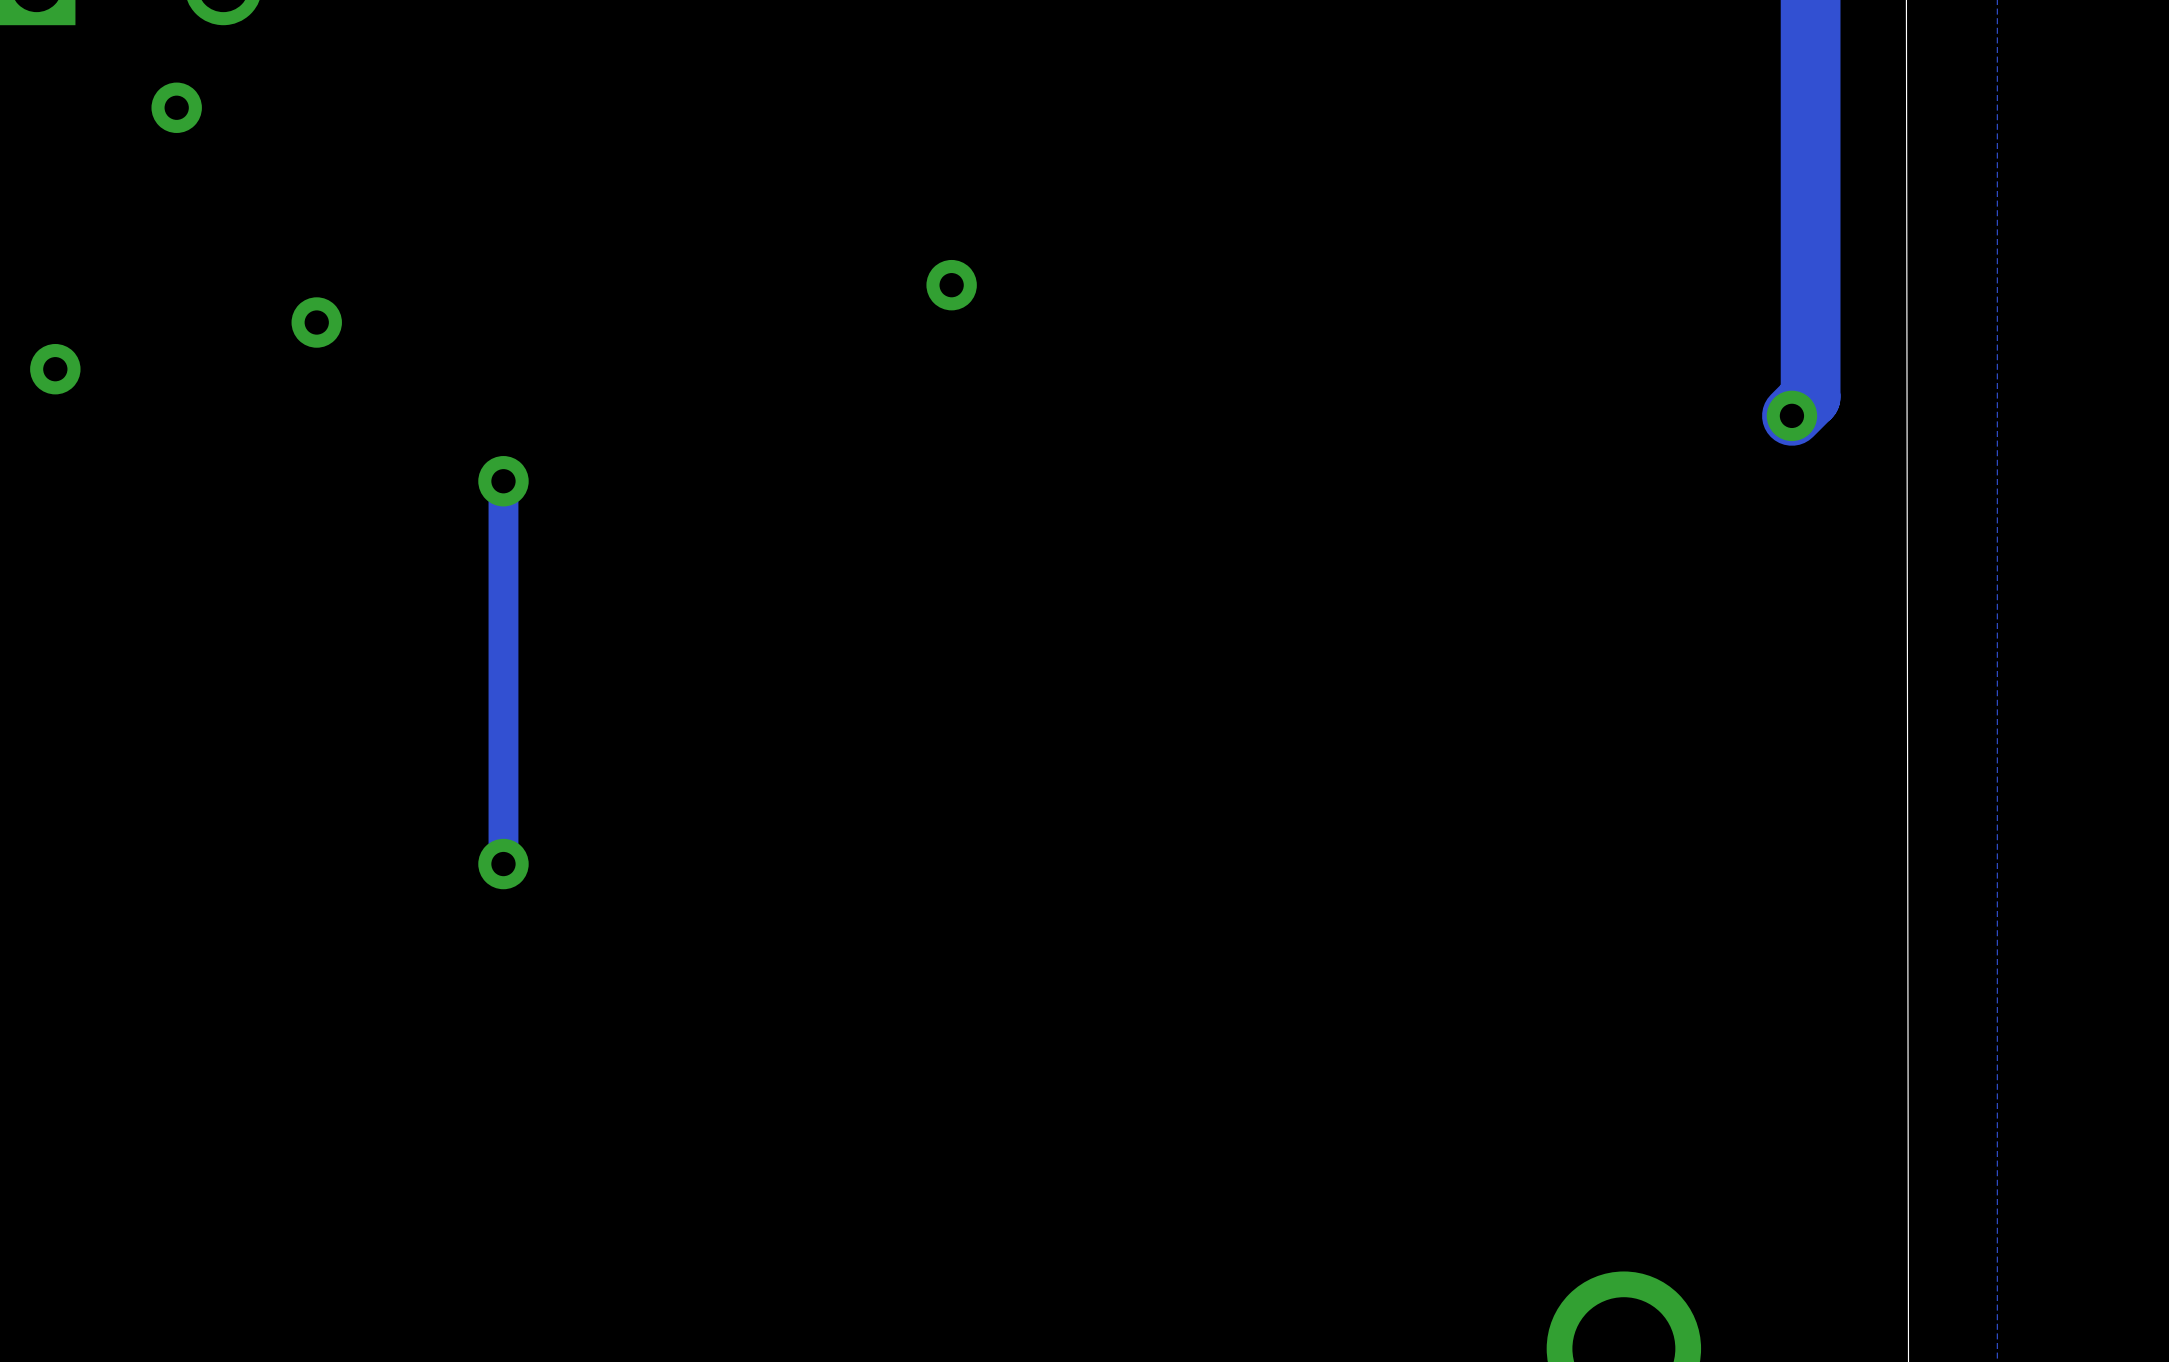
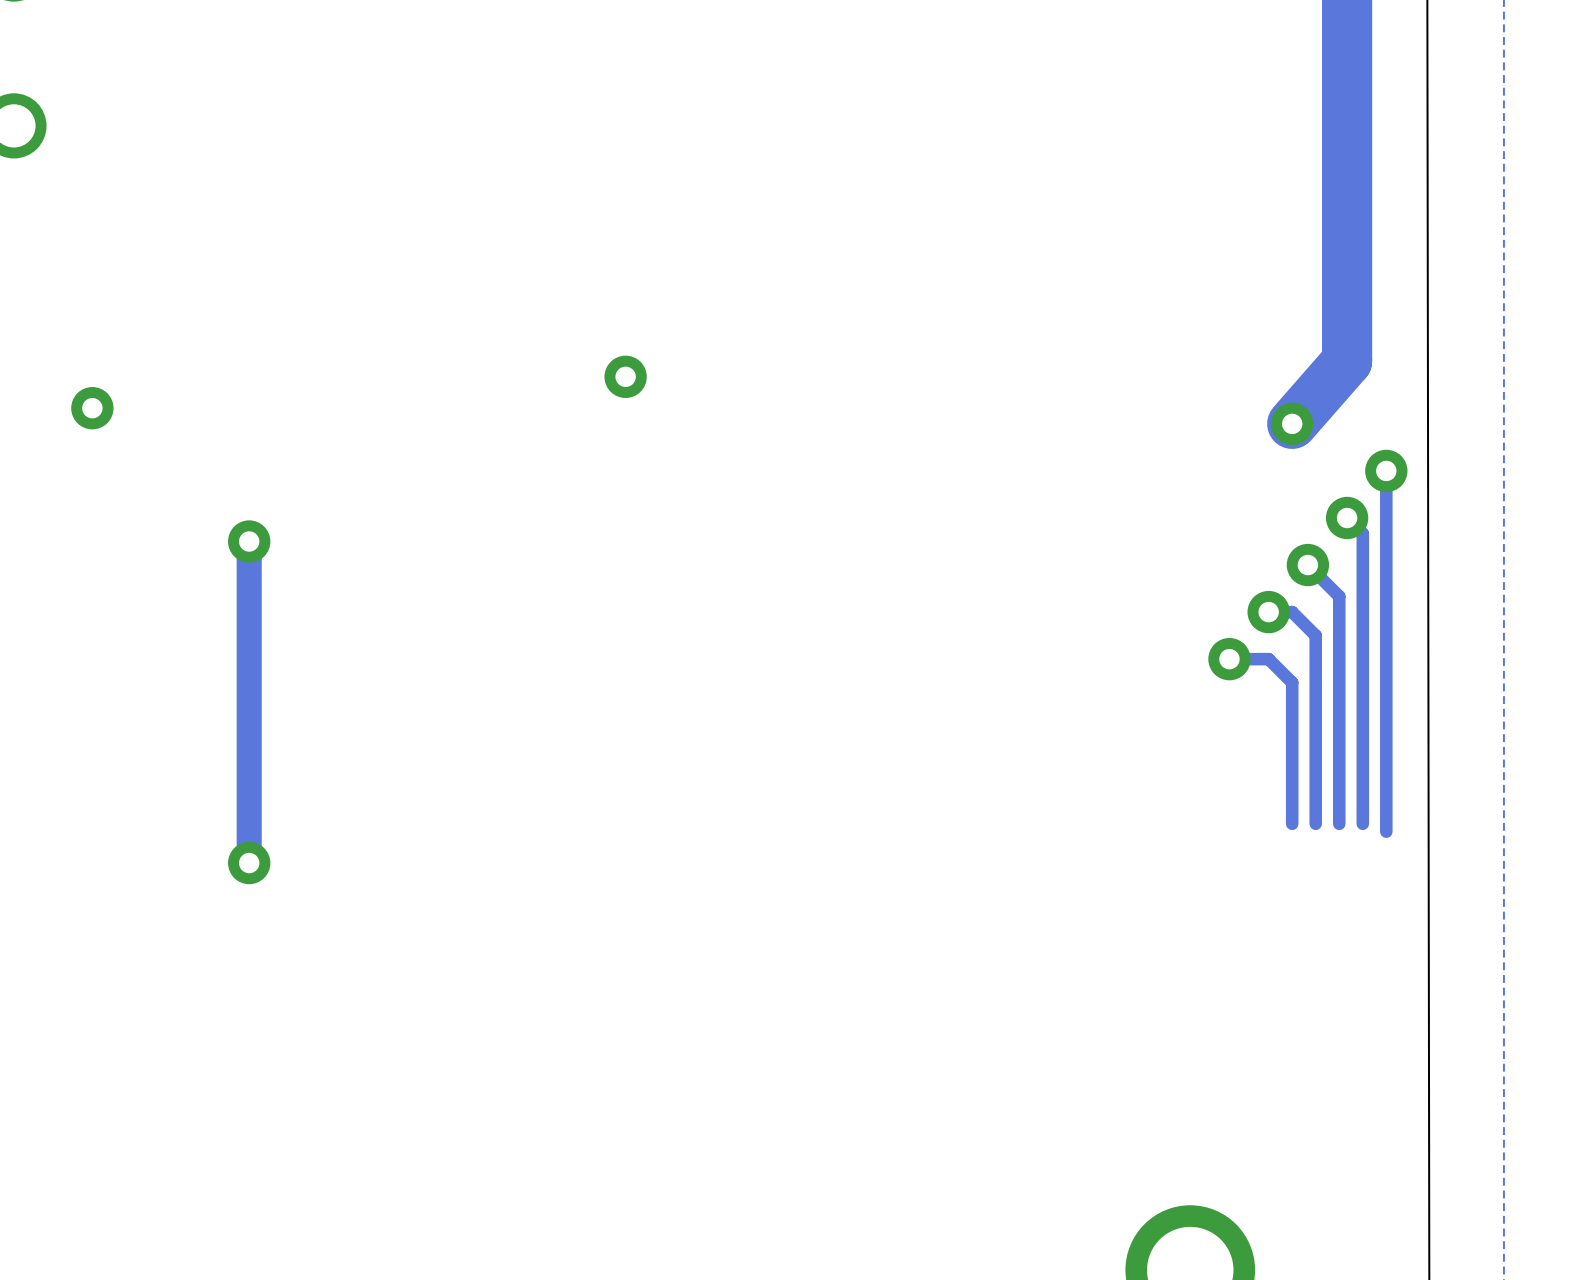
track: (1810, 266) (1810, 397) (1791, 415) -> (1347, 361) (1292, 423)
via: none -> (1292, 423)
track: none -> (1386, 470) (1386, 831)
via: none -> (1386, 470)
via position: (1791, 415) -> (1347, 517)
track: none -> (1347, 517) (1362, 533) (1362, 823)
track: none -> (1307, 565) (1339, 596) (1339, 823)
via: none -> (1307, 565)
track: none -> (1268, 612) (1292, 612) (1315, 635) (1315, 823)
via: none -> (1268, 612)
track: none -> (1229, 659) (1268, 659) (1292, 682) (1292, 823)
via: none -> (1229, 659)

